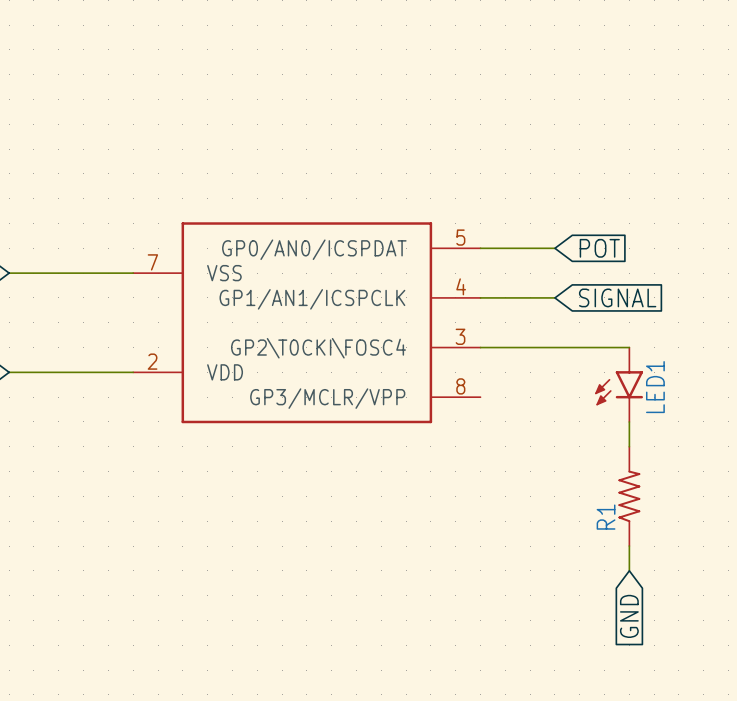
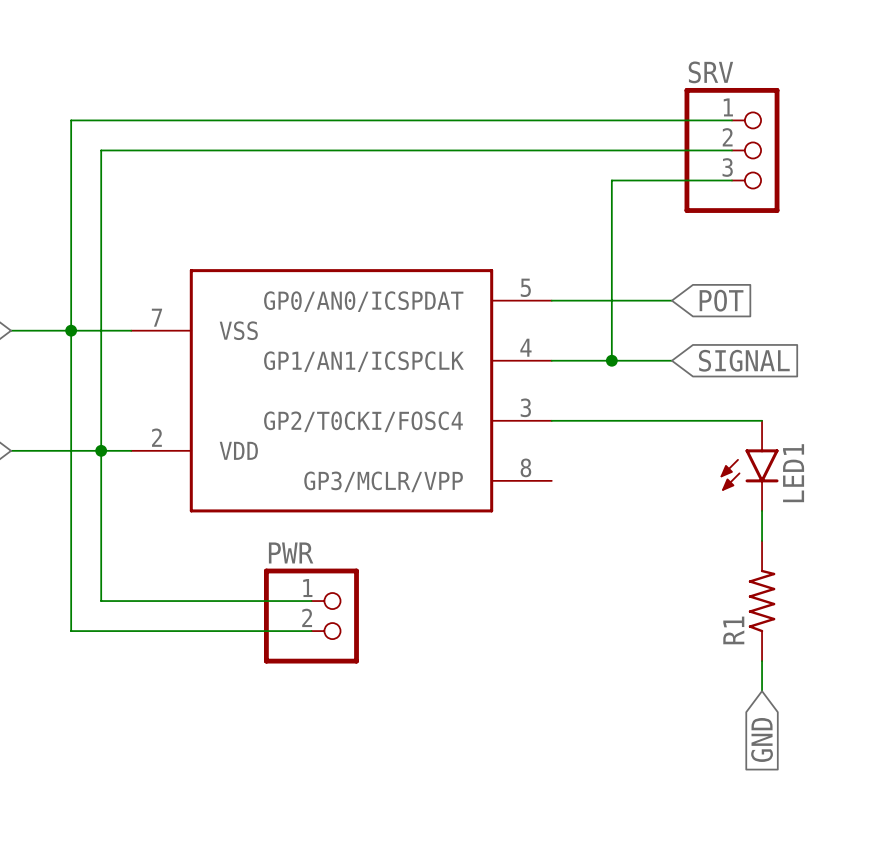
wire: none -> (731, 120) (71, 120) (71, 631) (311, 631)
wire: none -> (731, 150) (101, 150) (101, 601) (311, 601)
SRV: none -> (731, 150)
wire: none -> (731, 180) (611, 180) (611, 360)
junction: none -> (71, 330)
junction: none -> (611, 360)
part: none -> (341, 390)
part: (306, 322) -> none
junction: none -> (101, 450)
PWR: none -> (311, 616)

